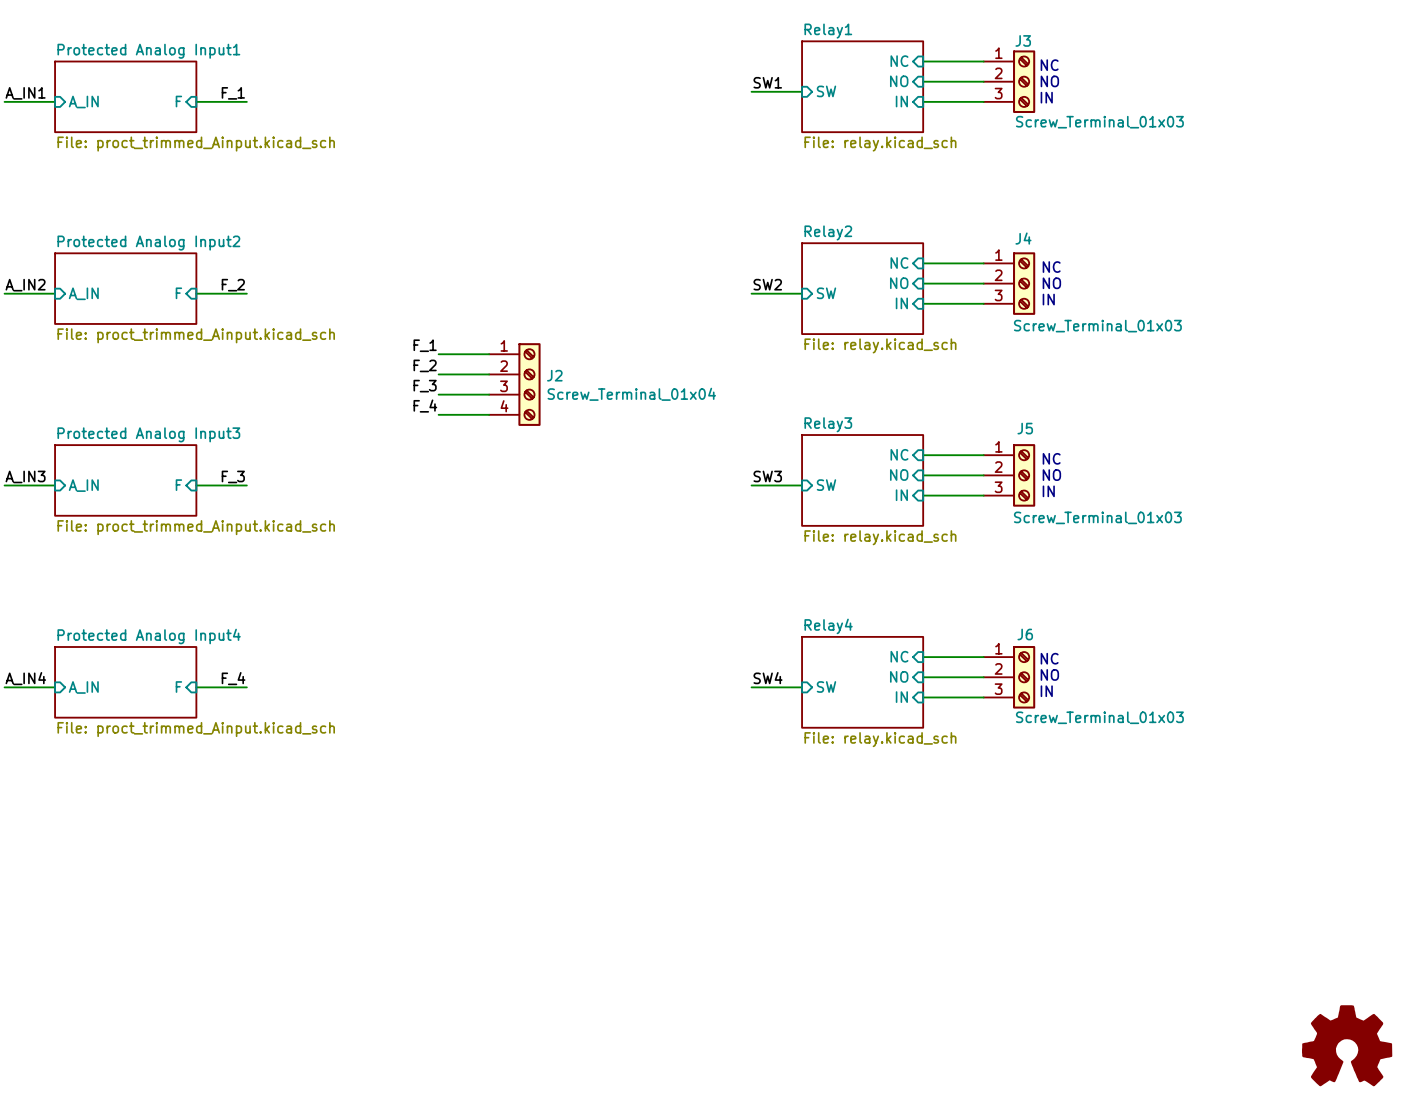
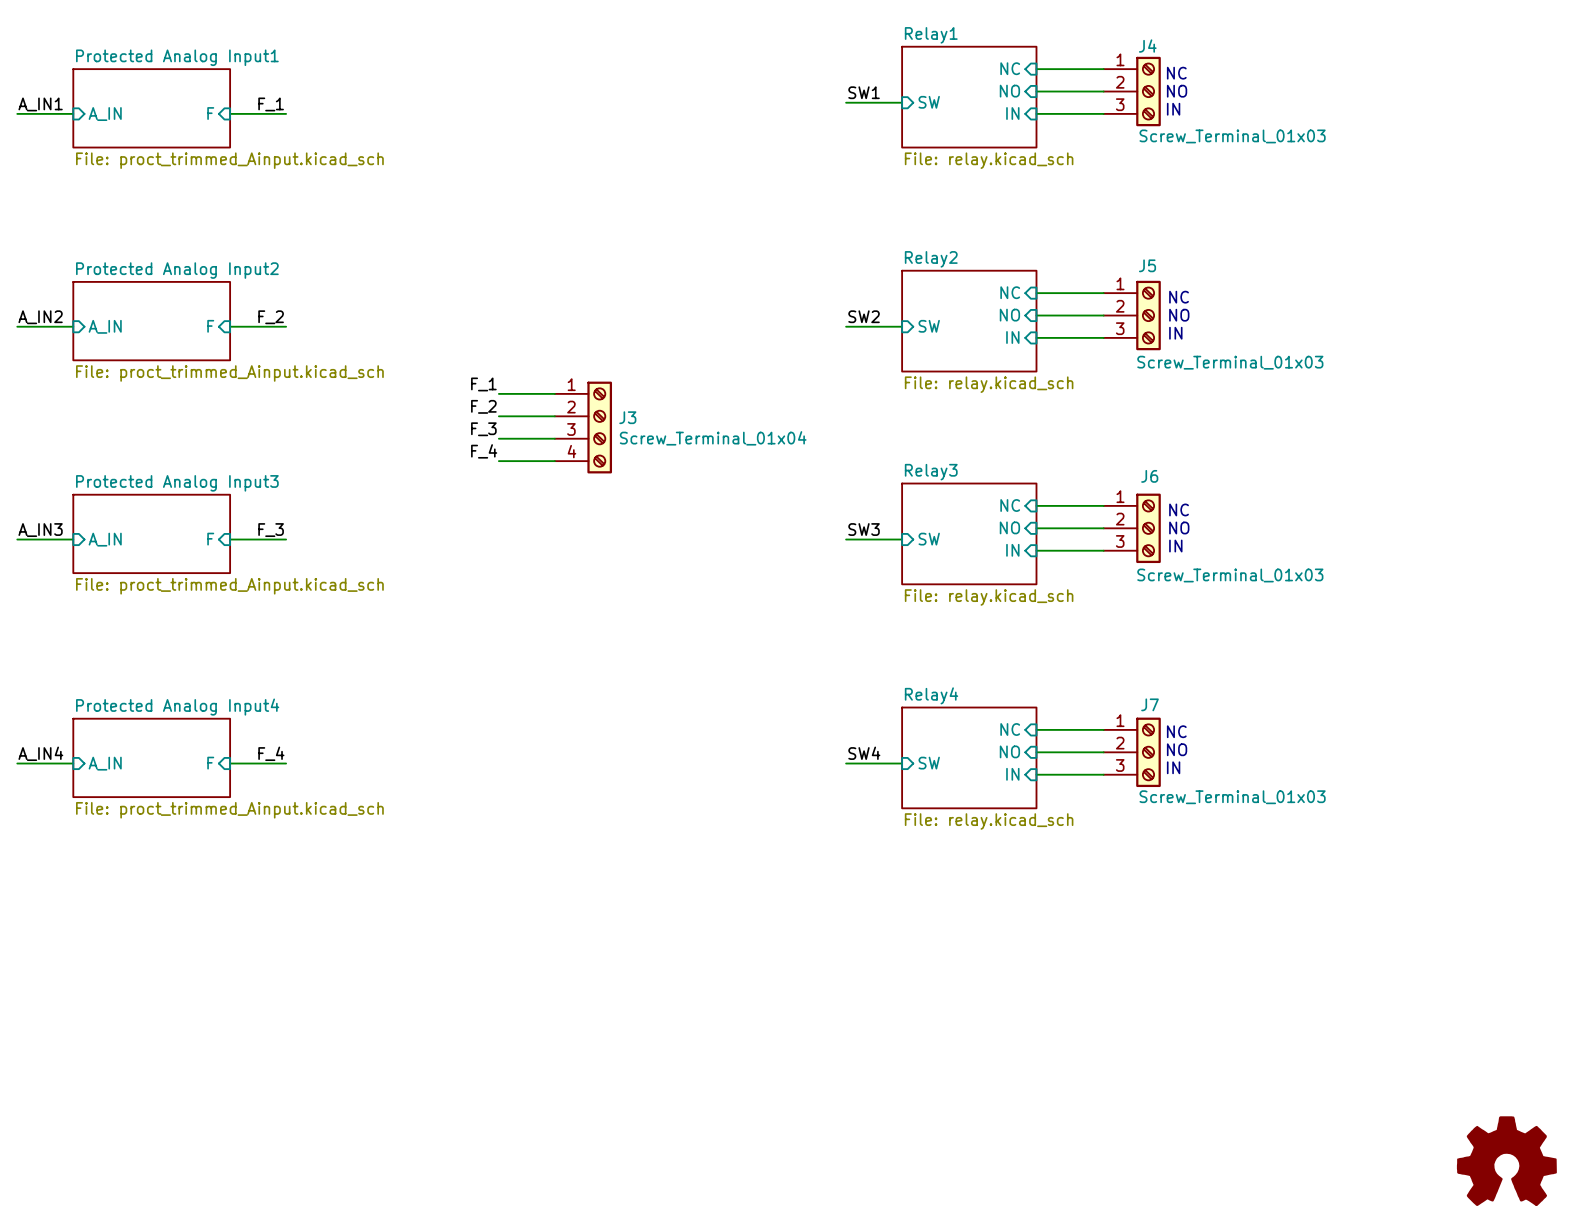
J3 name: J3 (1023, 40) -> J4 (1147, 46)
J4 name: J4 (1023, 238) -> J5 (1147, 265)
J2 name: J2 (554, 375) -> J3 (627, 417)
J5 name: J5 (1025, 428) -> J6 (1149, 476)
J6 name: J6 (1025, 634) -> J7 (1150, 704)

